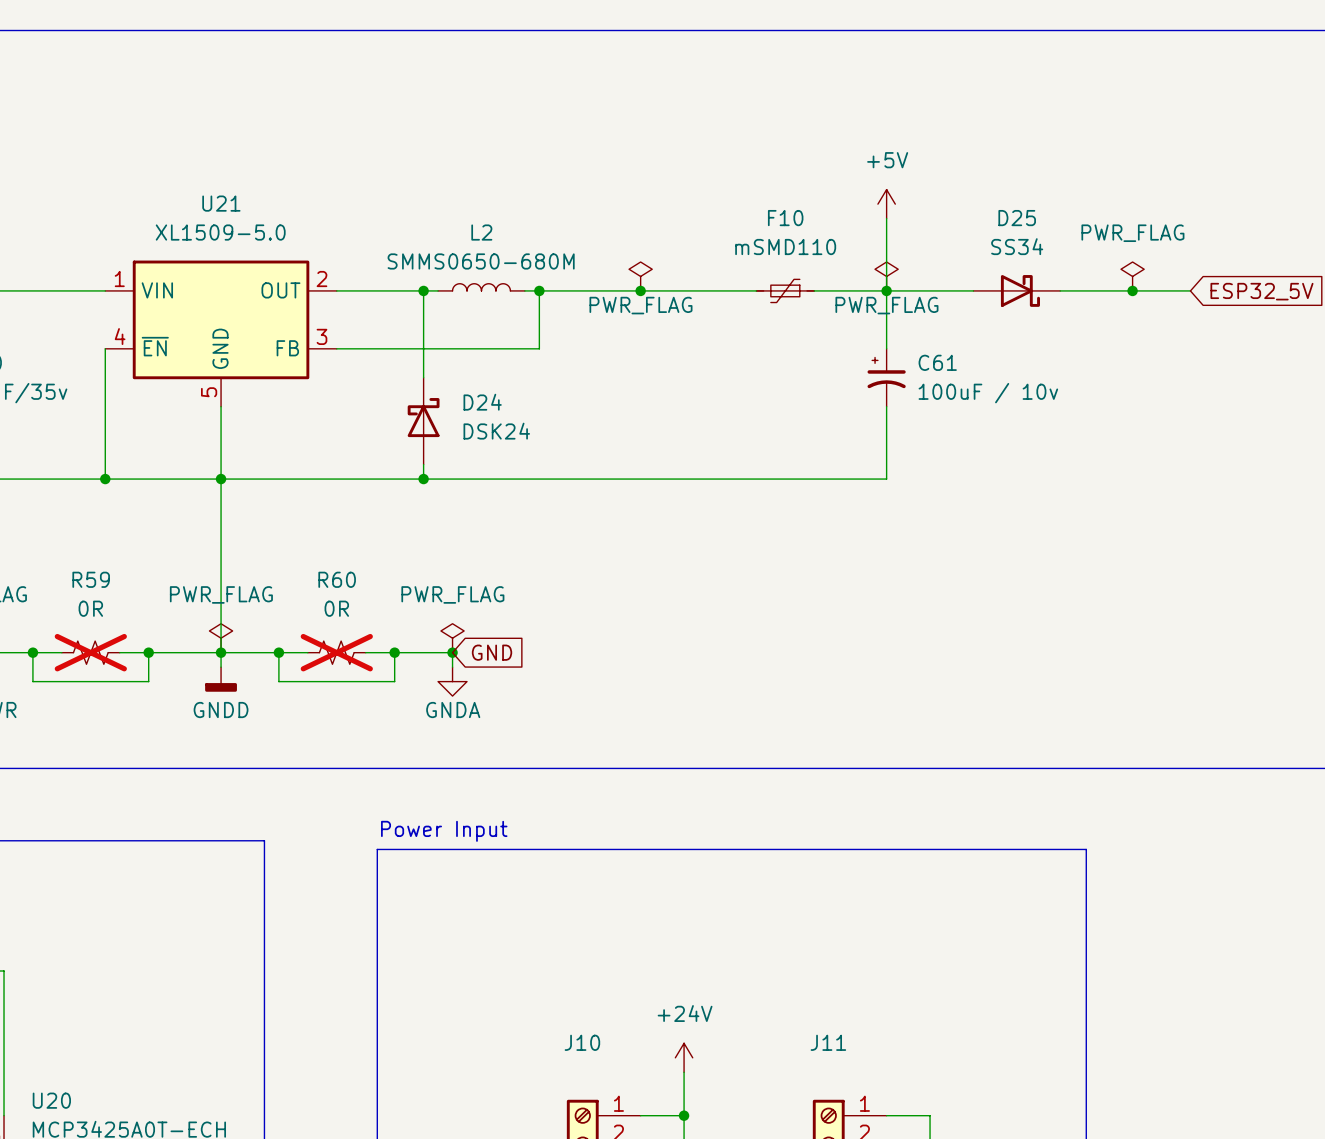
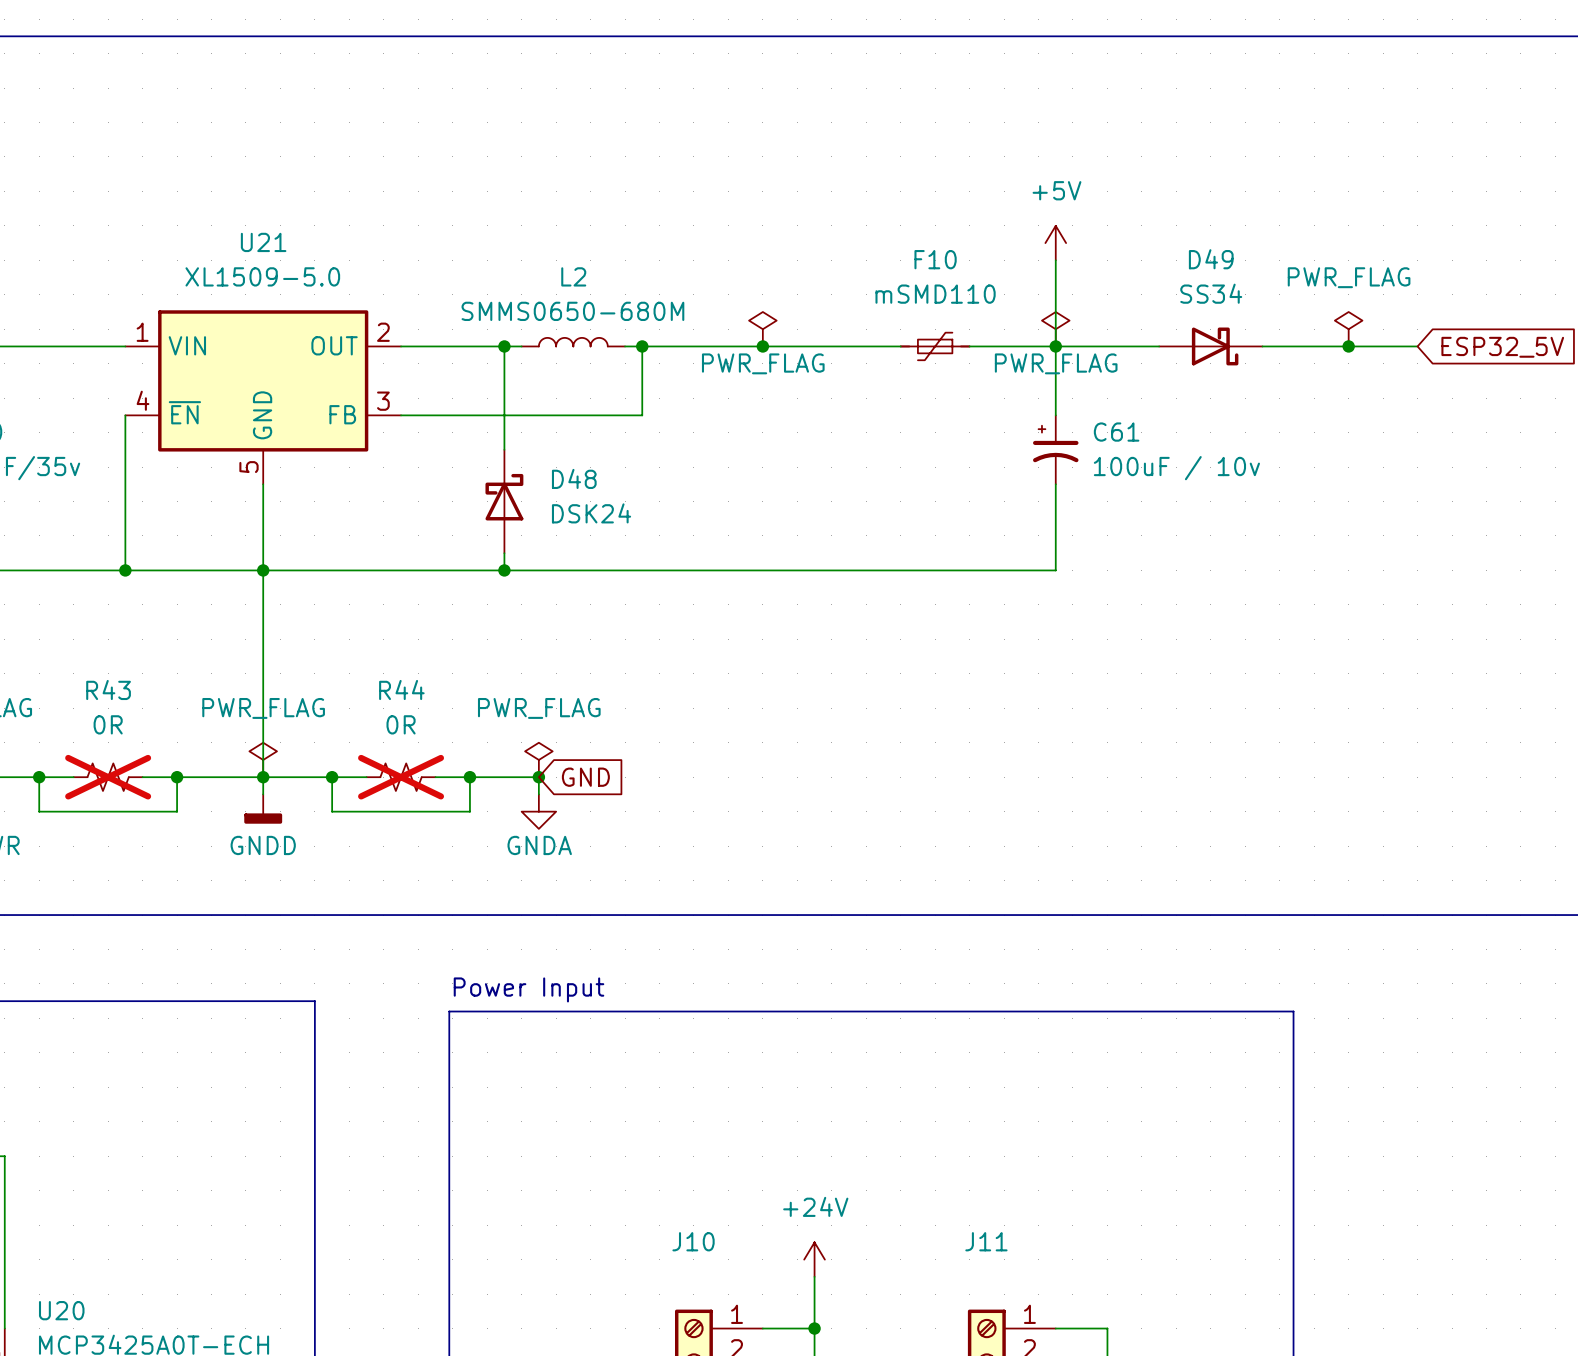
D25 name: D25 (1017, 218) -> D49 (1211, 259)
D24 name: D24 (482, 402) -> D48 (574, 478)
R59 name: R59 (91, 579) -> R43 (108, 689)
R60 name: R60 (337, 579) -> R44 (401, 689)

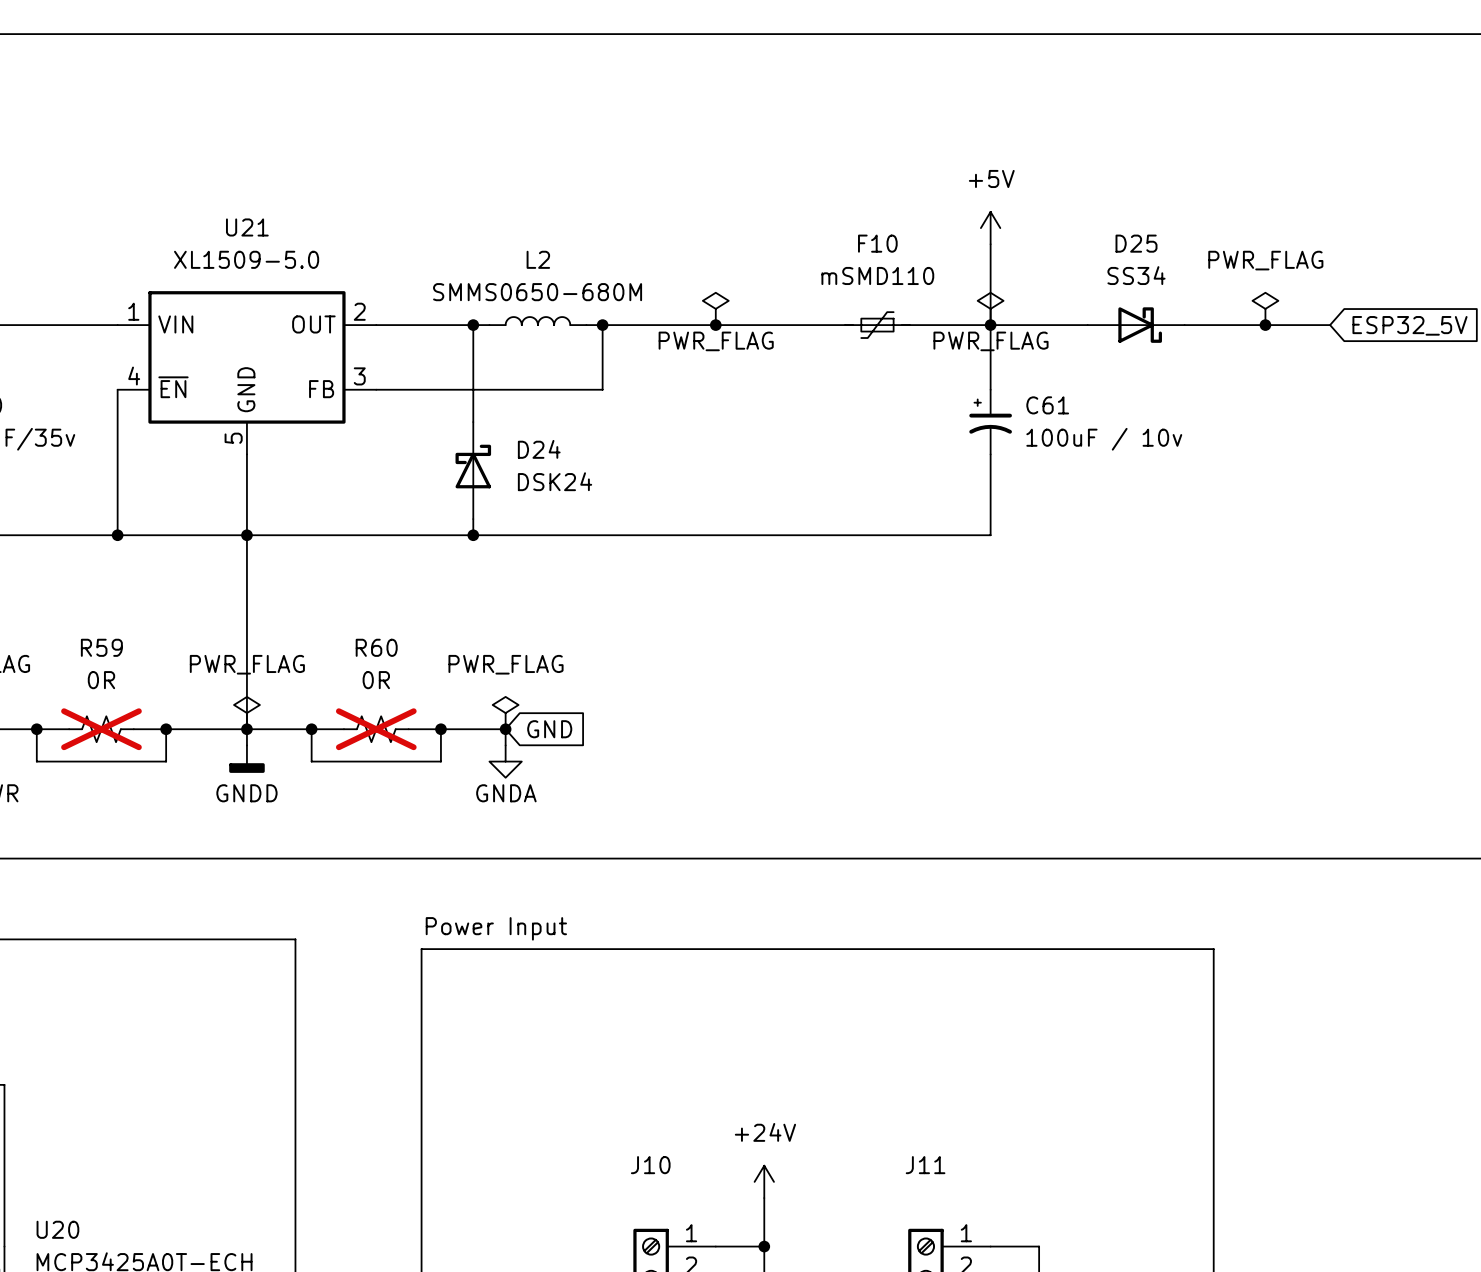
D49 name: D49 (1211, 259) -> D25 (1136, 243)
D48 name: D48 (574, 478) -> D24 (539, 449)
R43 name: R43 (108, 689) -> R59 (101, 647)
R44 name: R44 (401, 689) -> R60 (376, 647)

